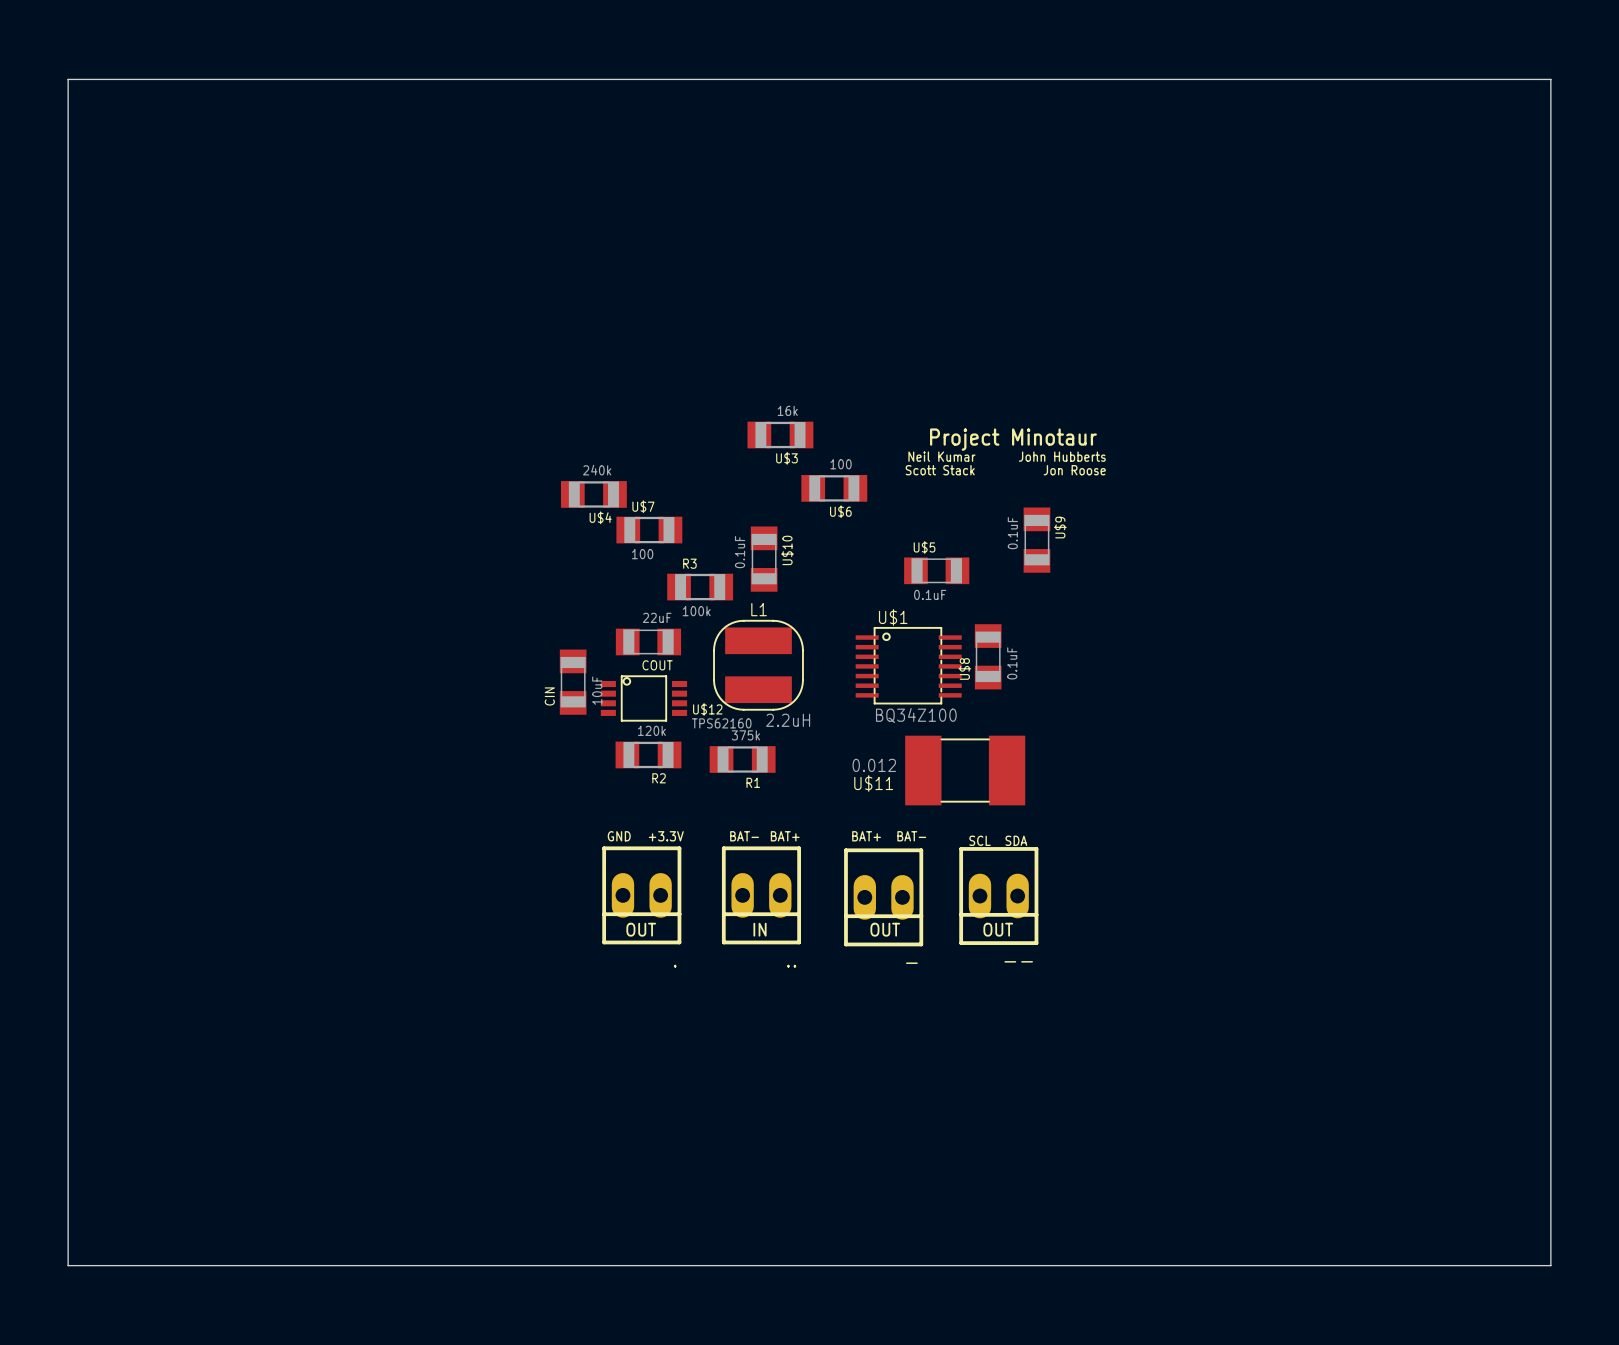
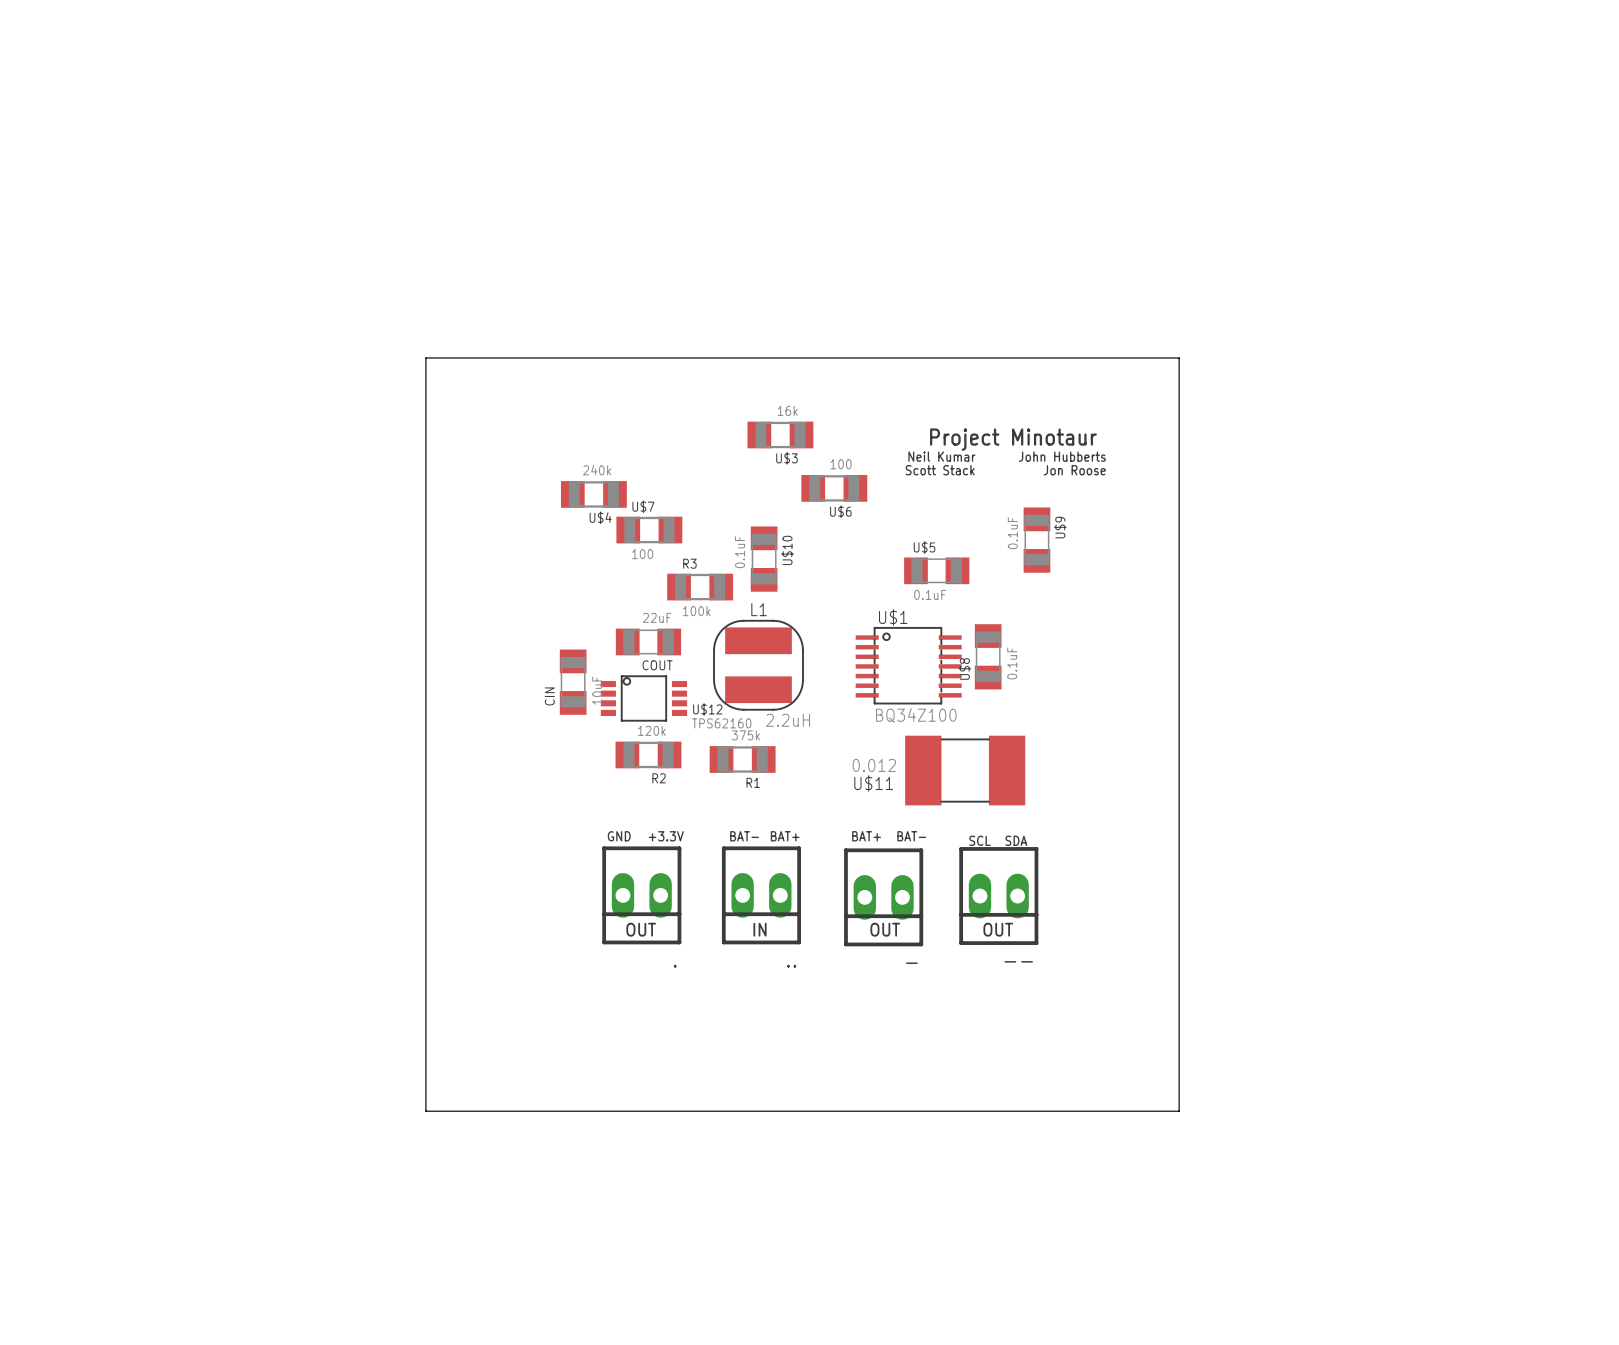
board edge: (68, 79) (1550, 79) (1550, 1265) (68, 1265) (68, 79) -> none
board edge: none -> (425, 357) (1179, 357) (1179, 1111) (425, 1111) (425, 357)

